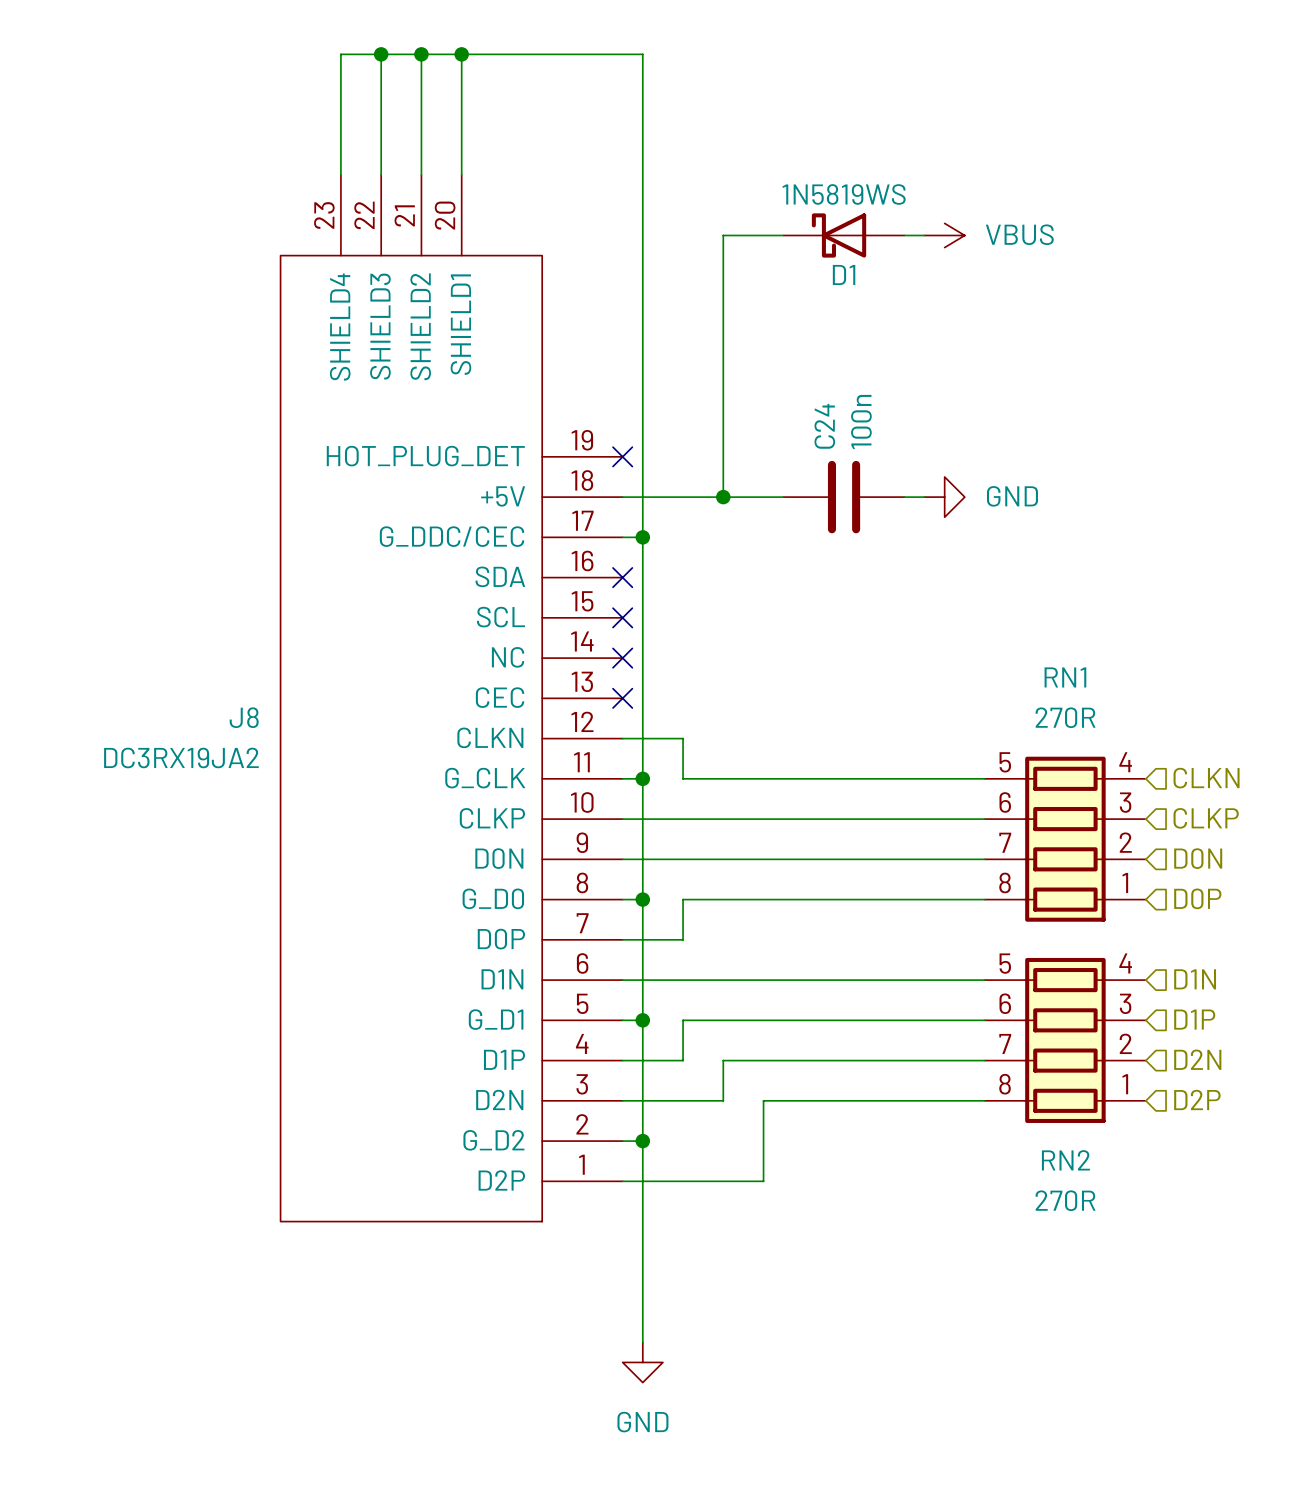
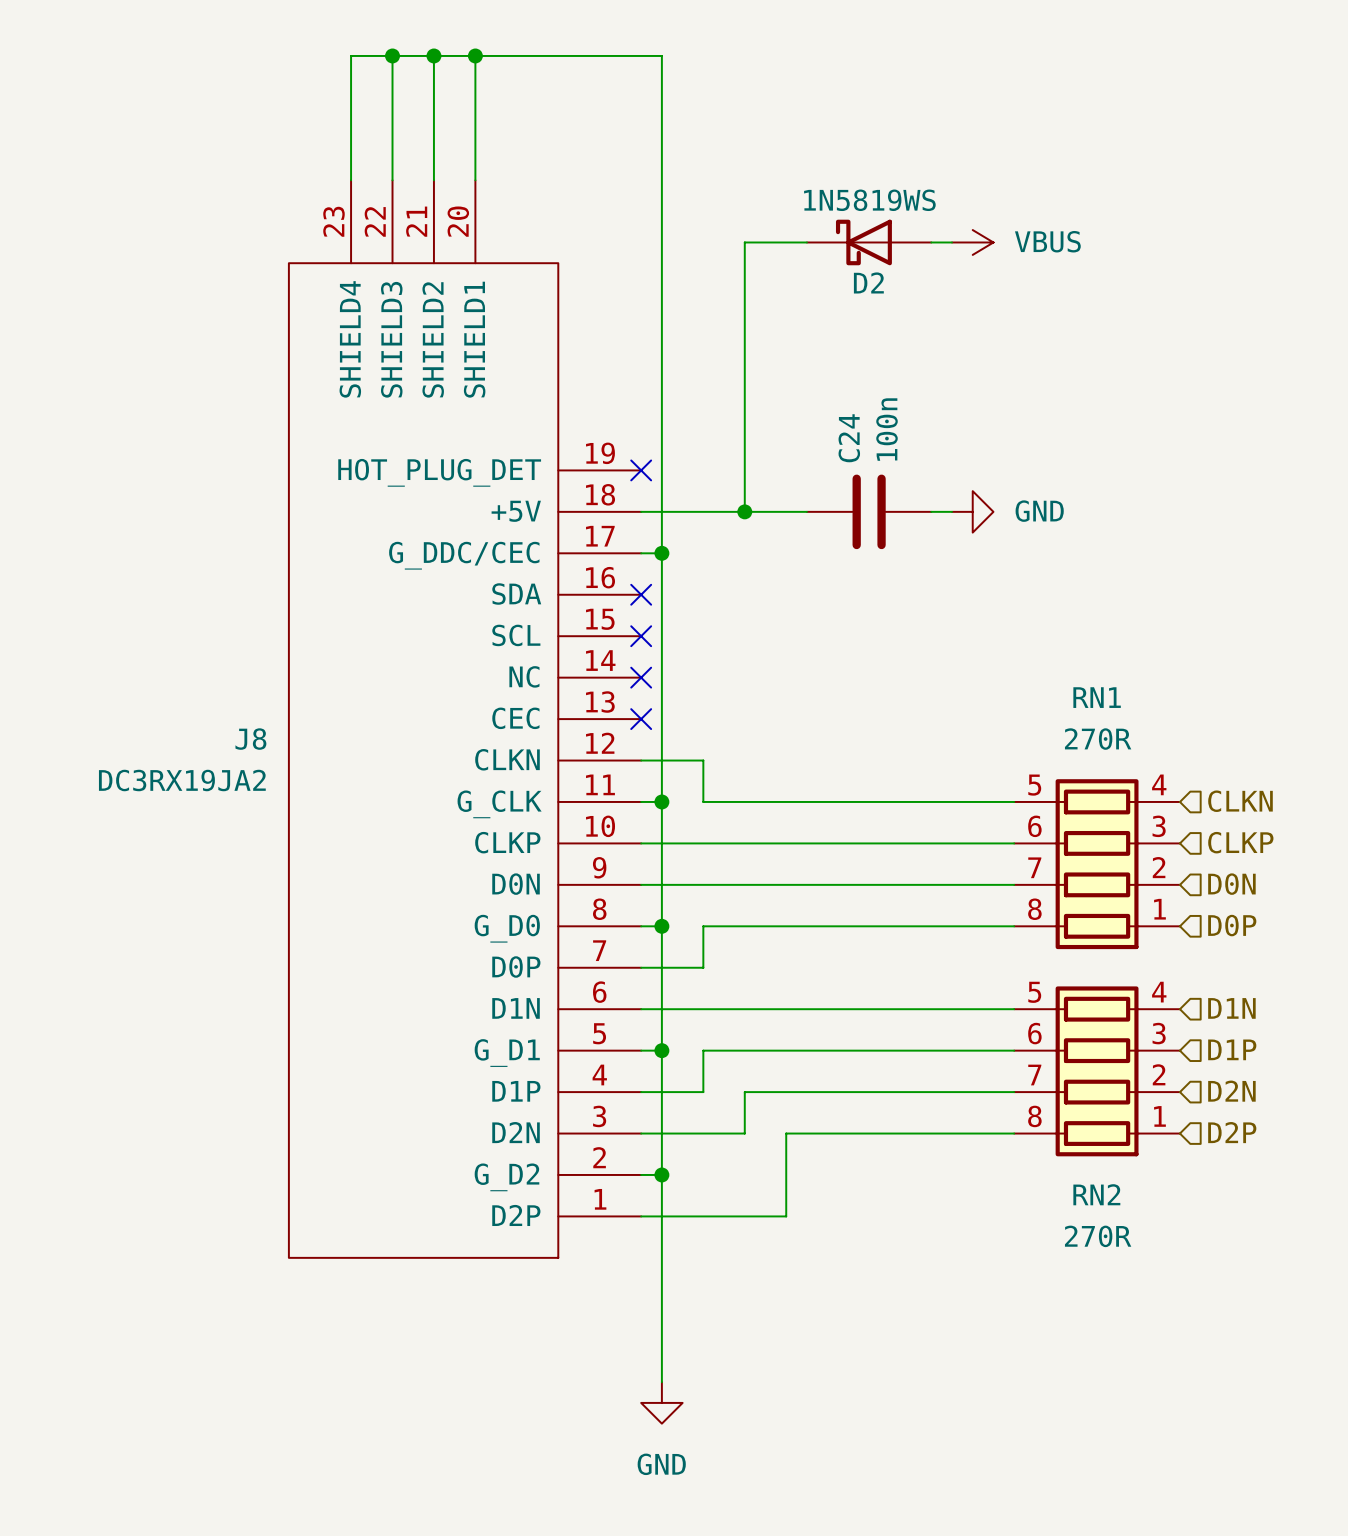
D1 name: D1 (844, 274) -> D2 (868, 282)

